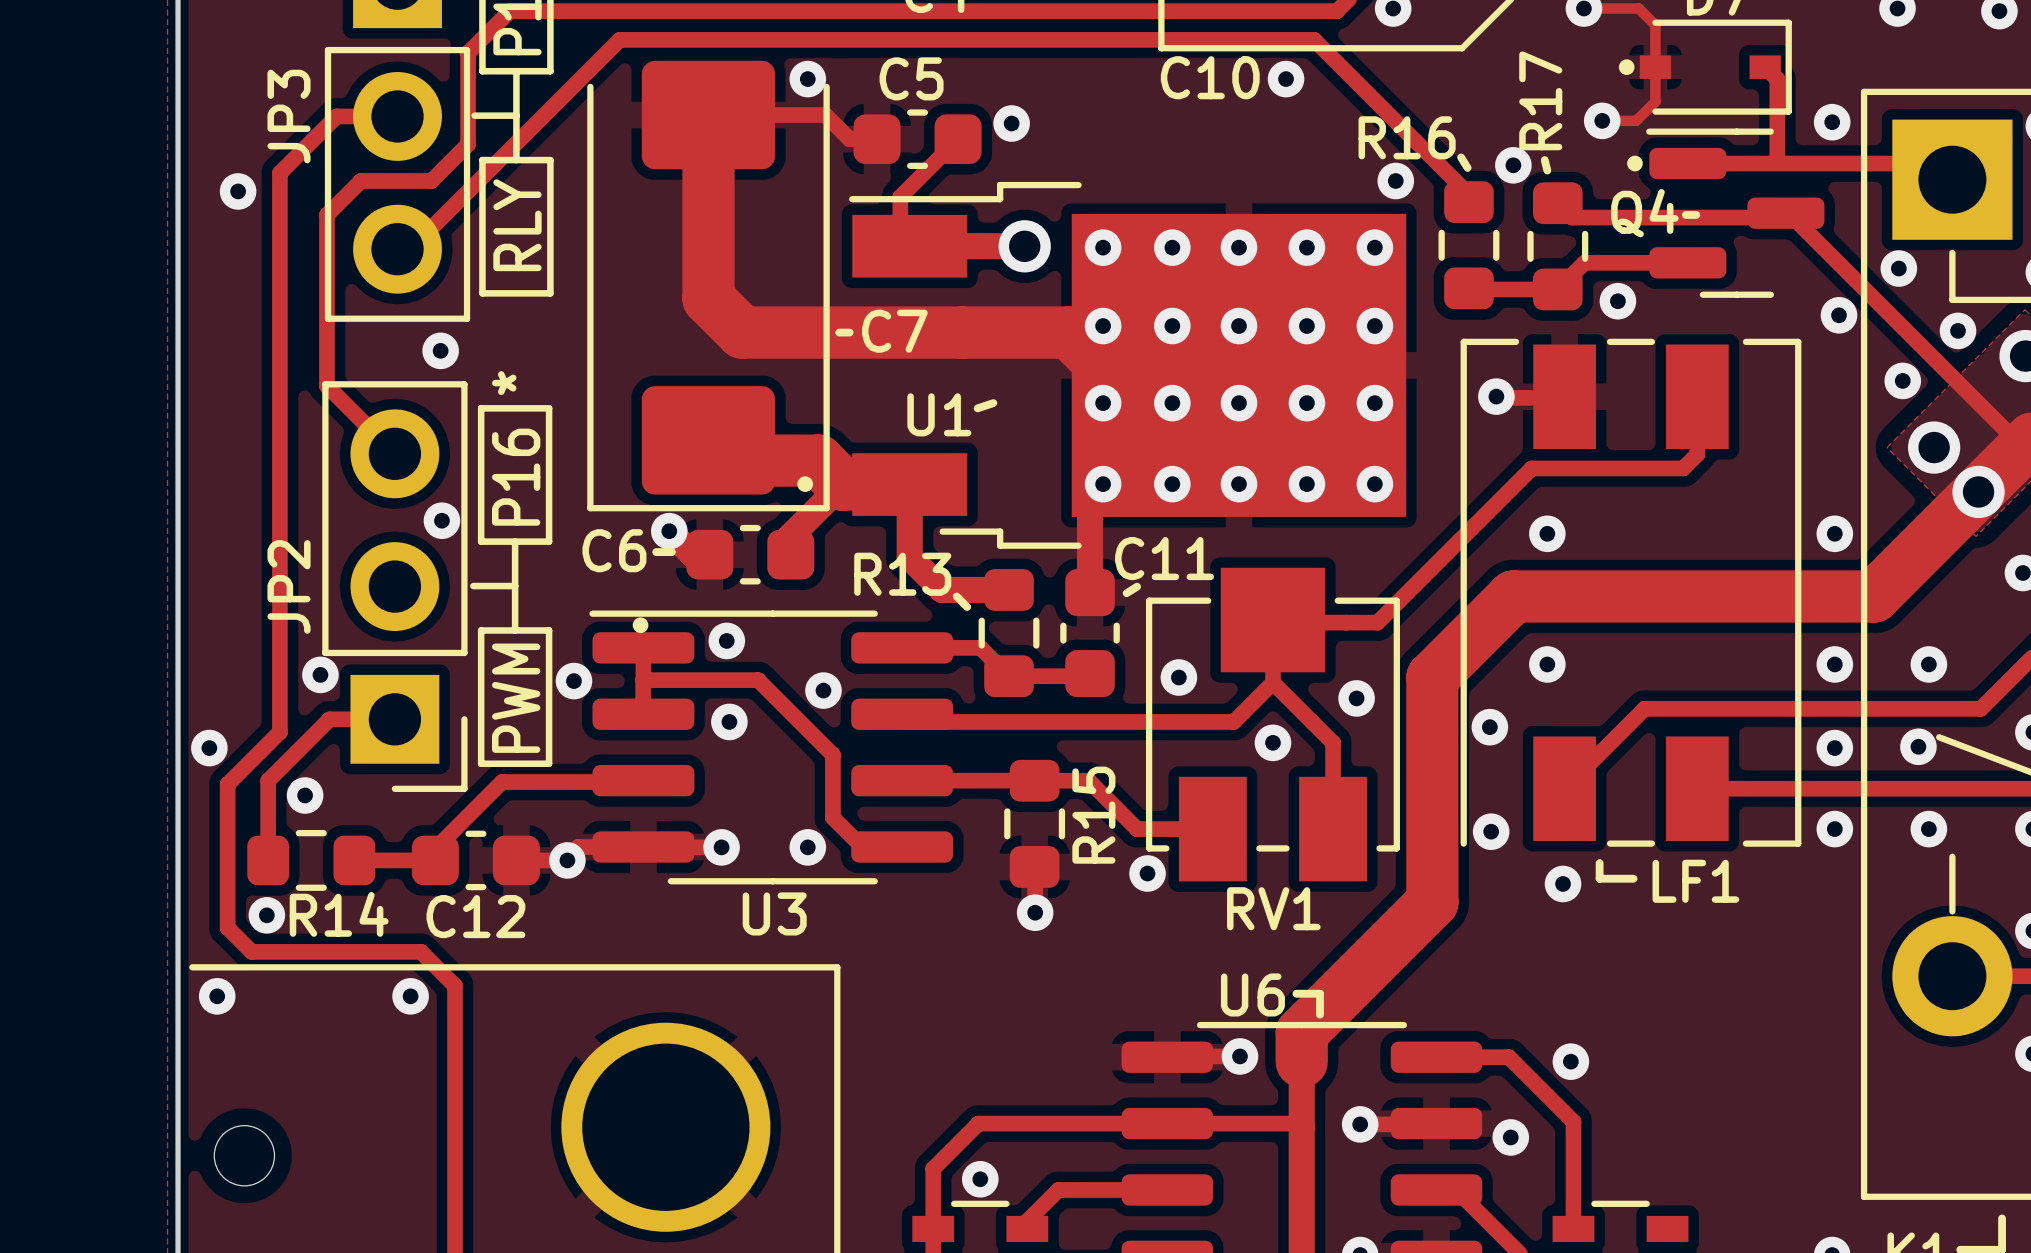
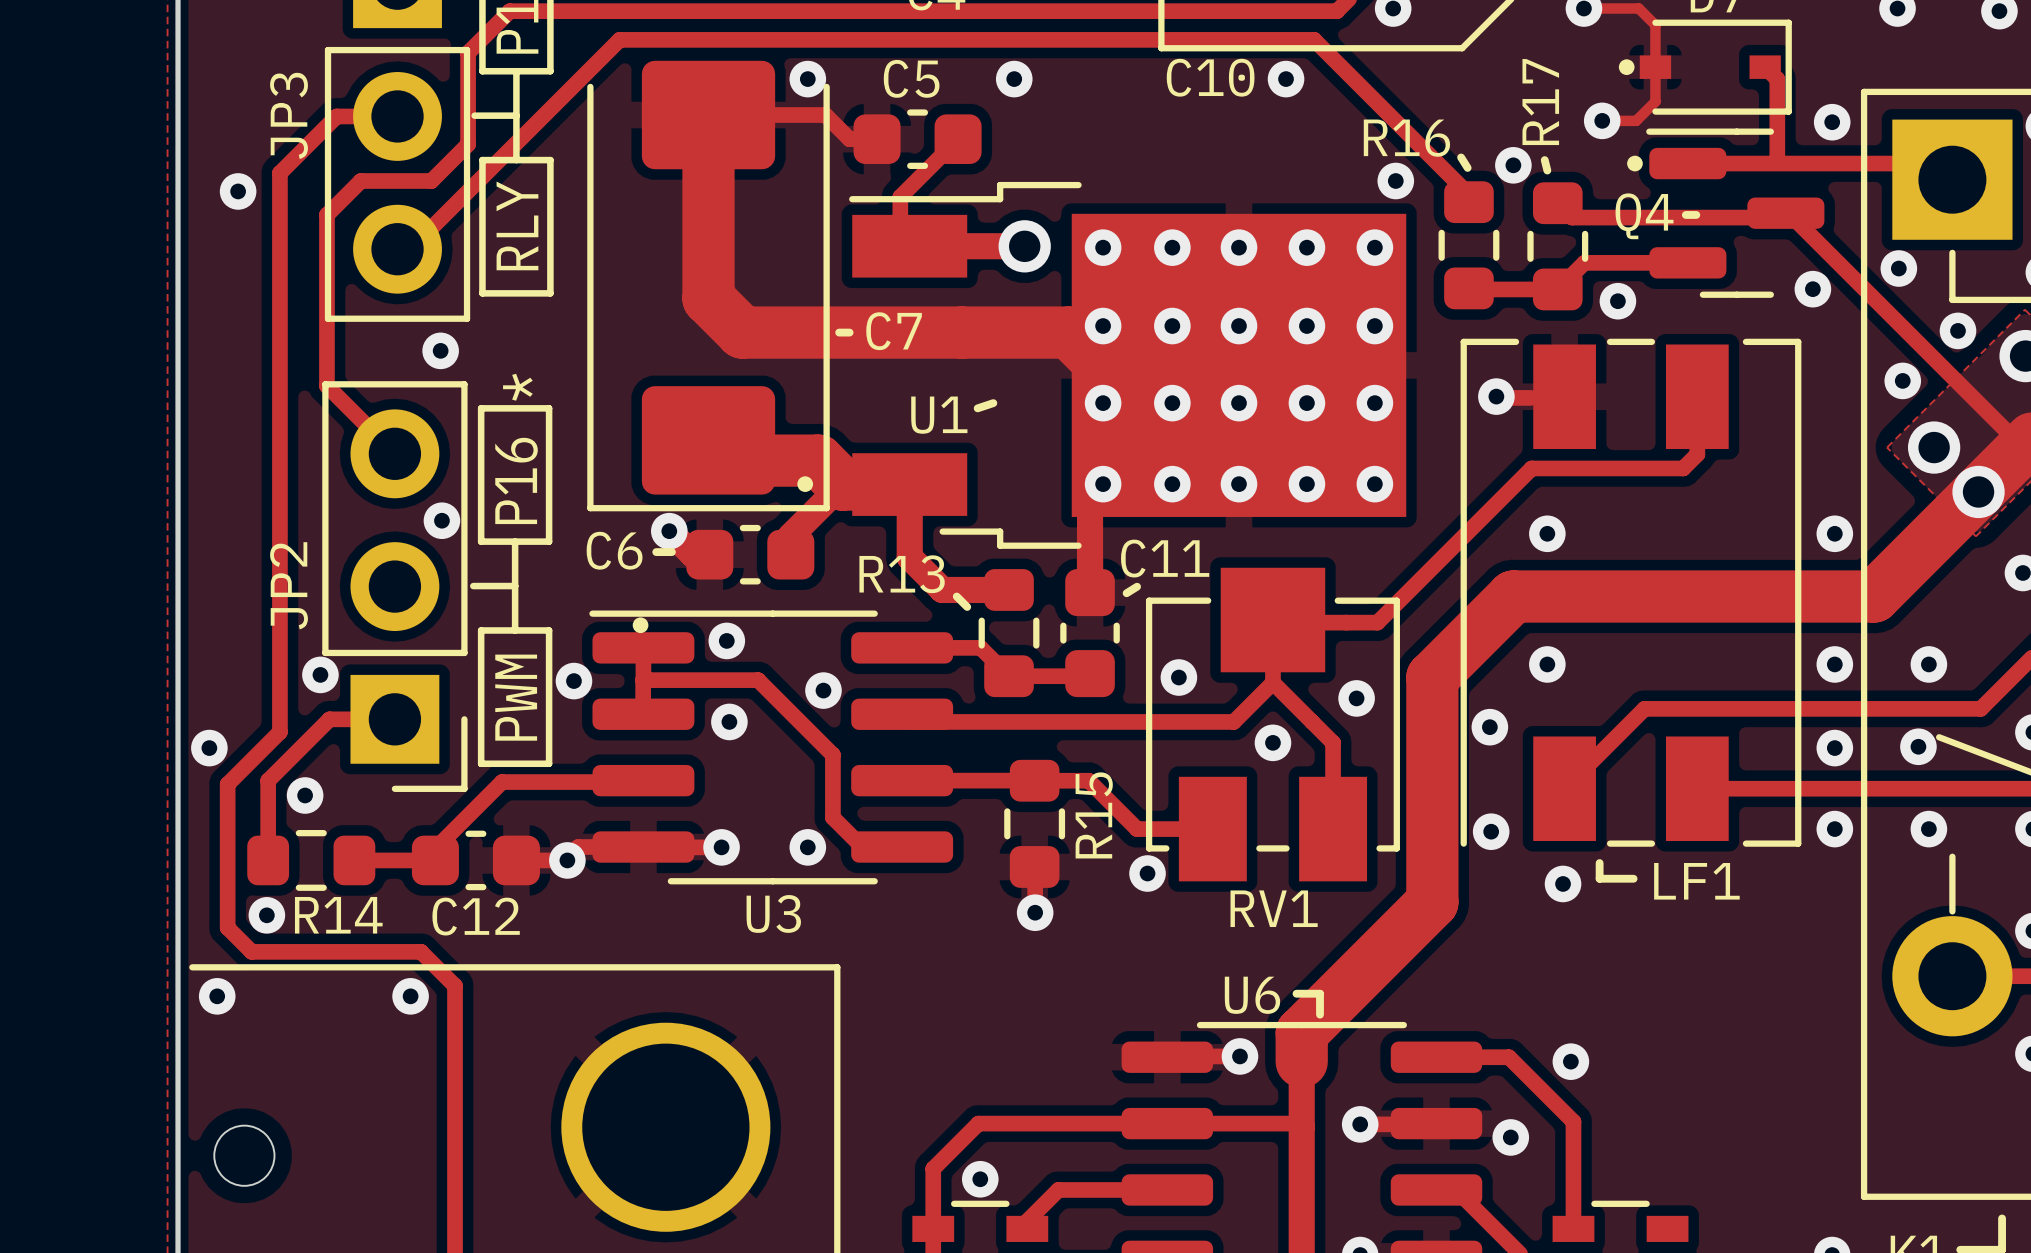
via position: (1011, 123) -> (1014, 79)
via position: (1839, 315) -> (1812, 289)

